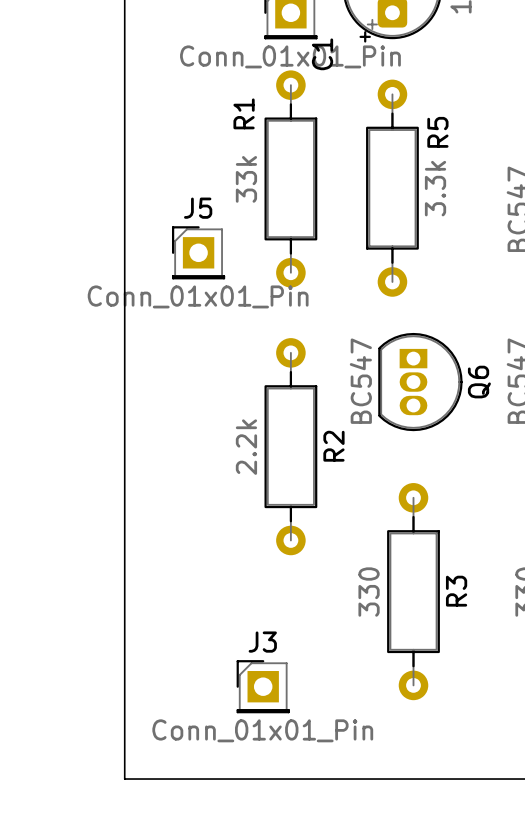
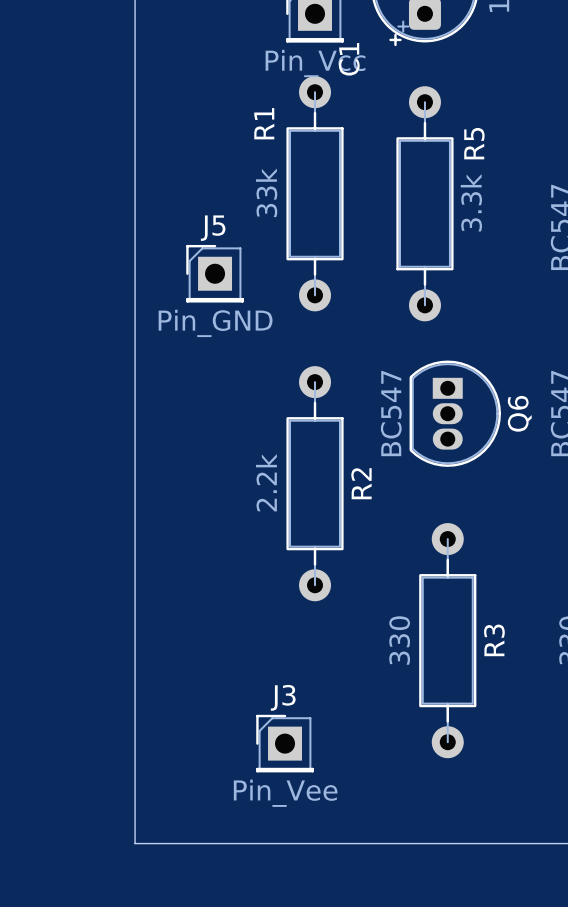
part value: Conn_01x01_Pin (290, 56) -> Pin_Vcc (315, 63)
J5 value: Conn_01x01_Pin (198, 296) -> Pin_GND (215, 323)
J3 value: Conn_01x01_Pin (262, 730) -> Pin_Vee (285, 793)

